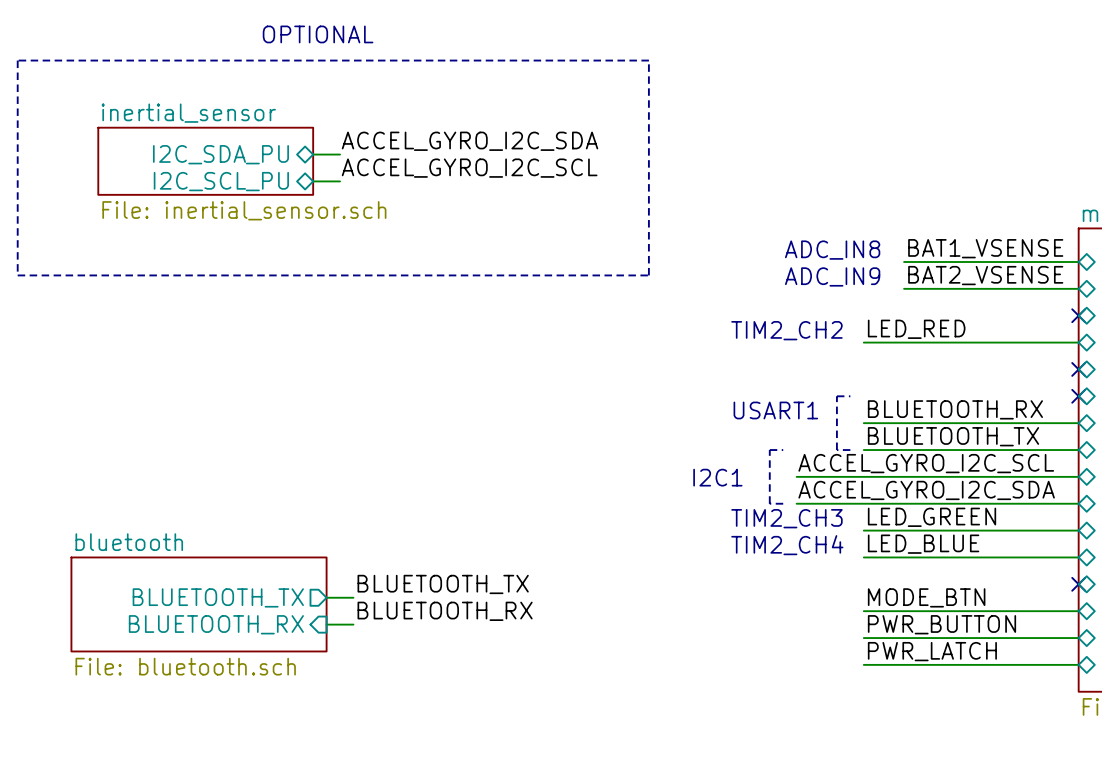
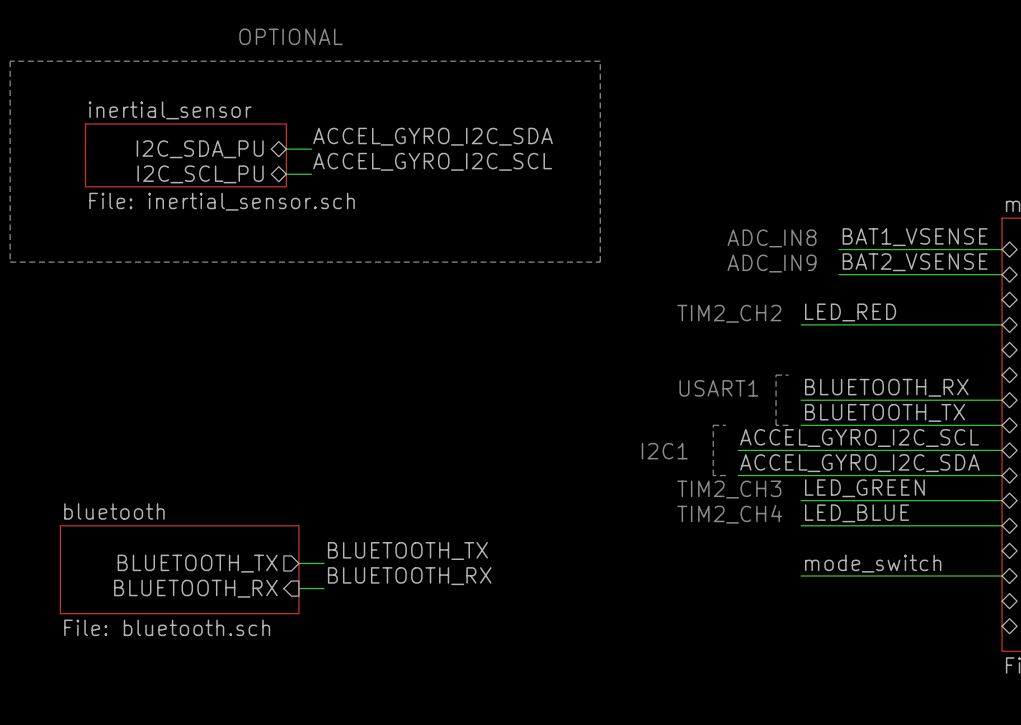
no-connect mark: (1078, 315) -> none
no-connect mark: (1078, 369) -> none
no-connect mark: (1078, 396) -> none
no-connect mark: (1078, 584) -> none
label: MODE_BTN (926, 597) -> mode_switch (873, 563)
label: PWR_BUTTON (941, 624) -> none
wire: (863, 638) (1078, 638) -> none
label: PWR_LATCH (932, 651) -> none
wire: (863, 664) (1078, 664) -> none

